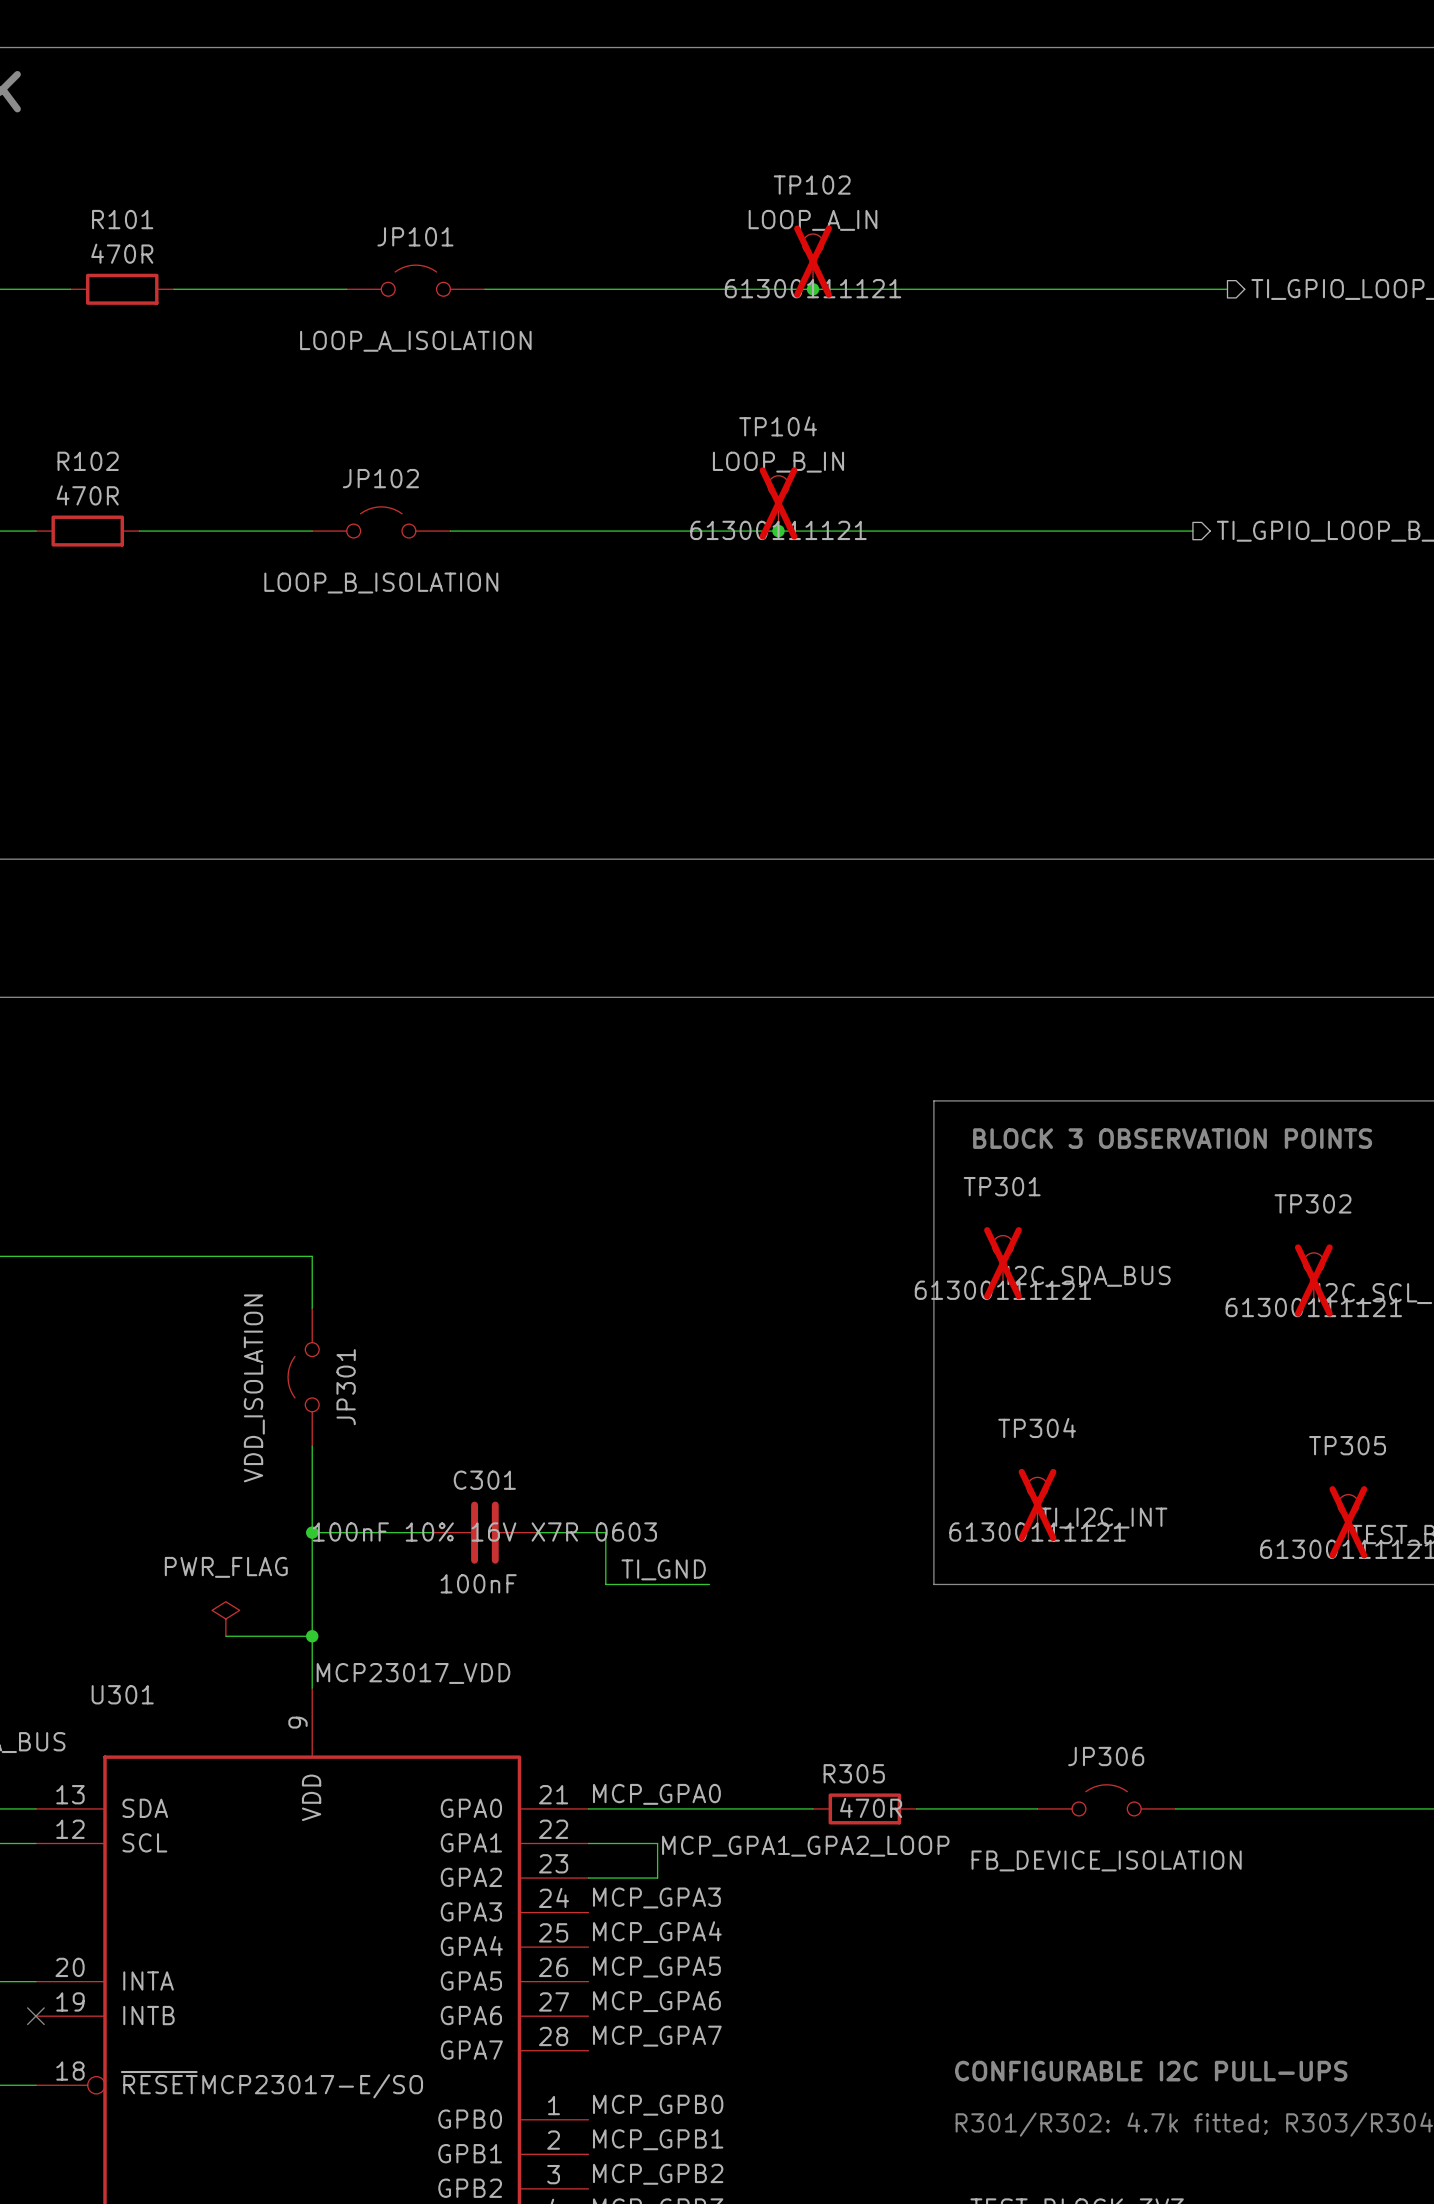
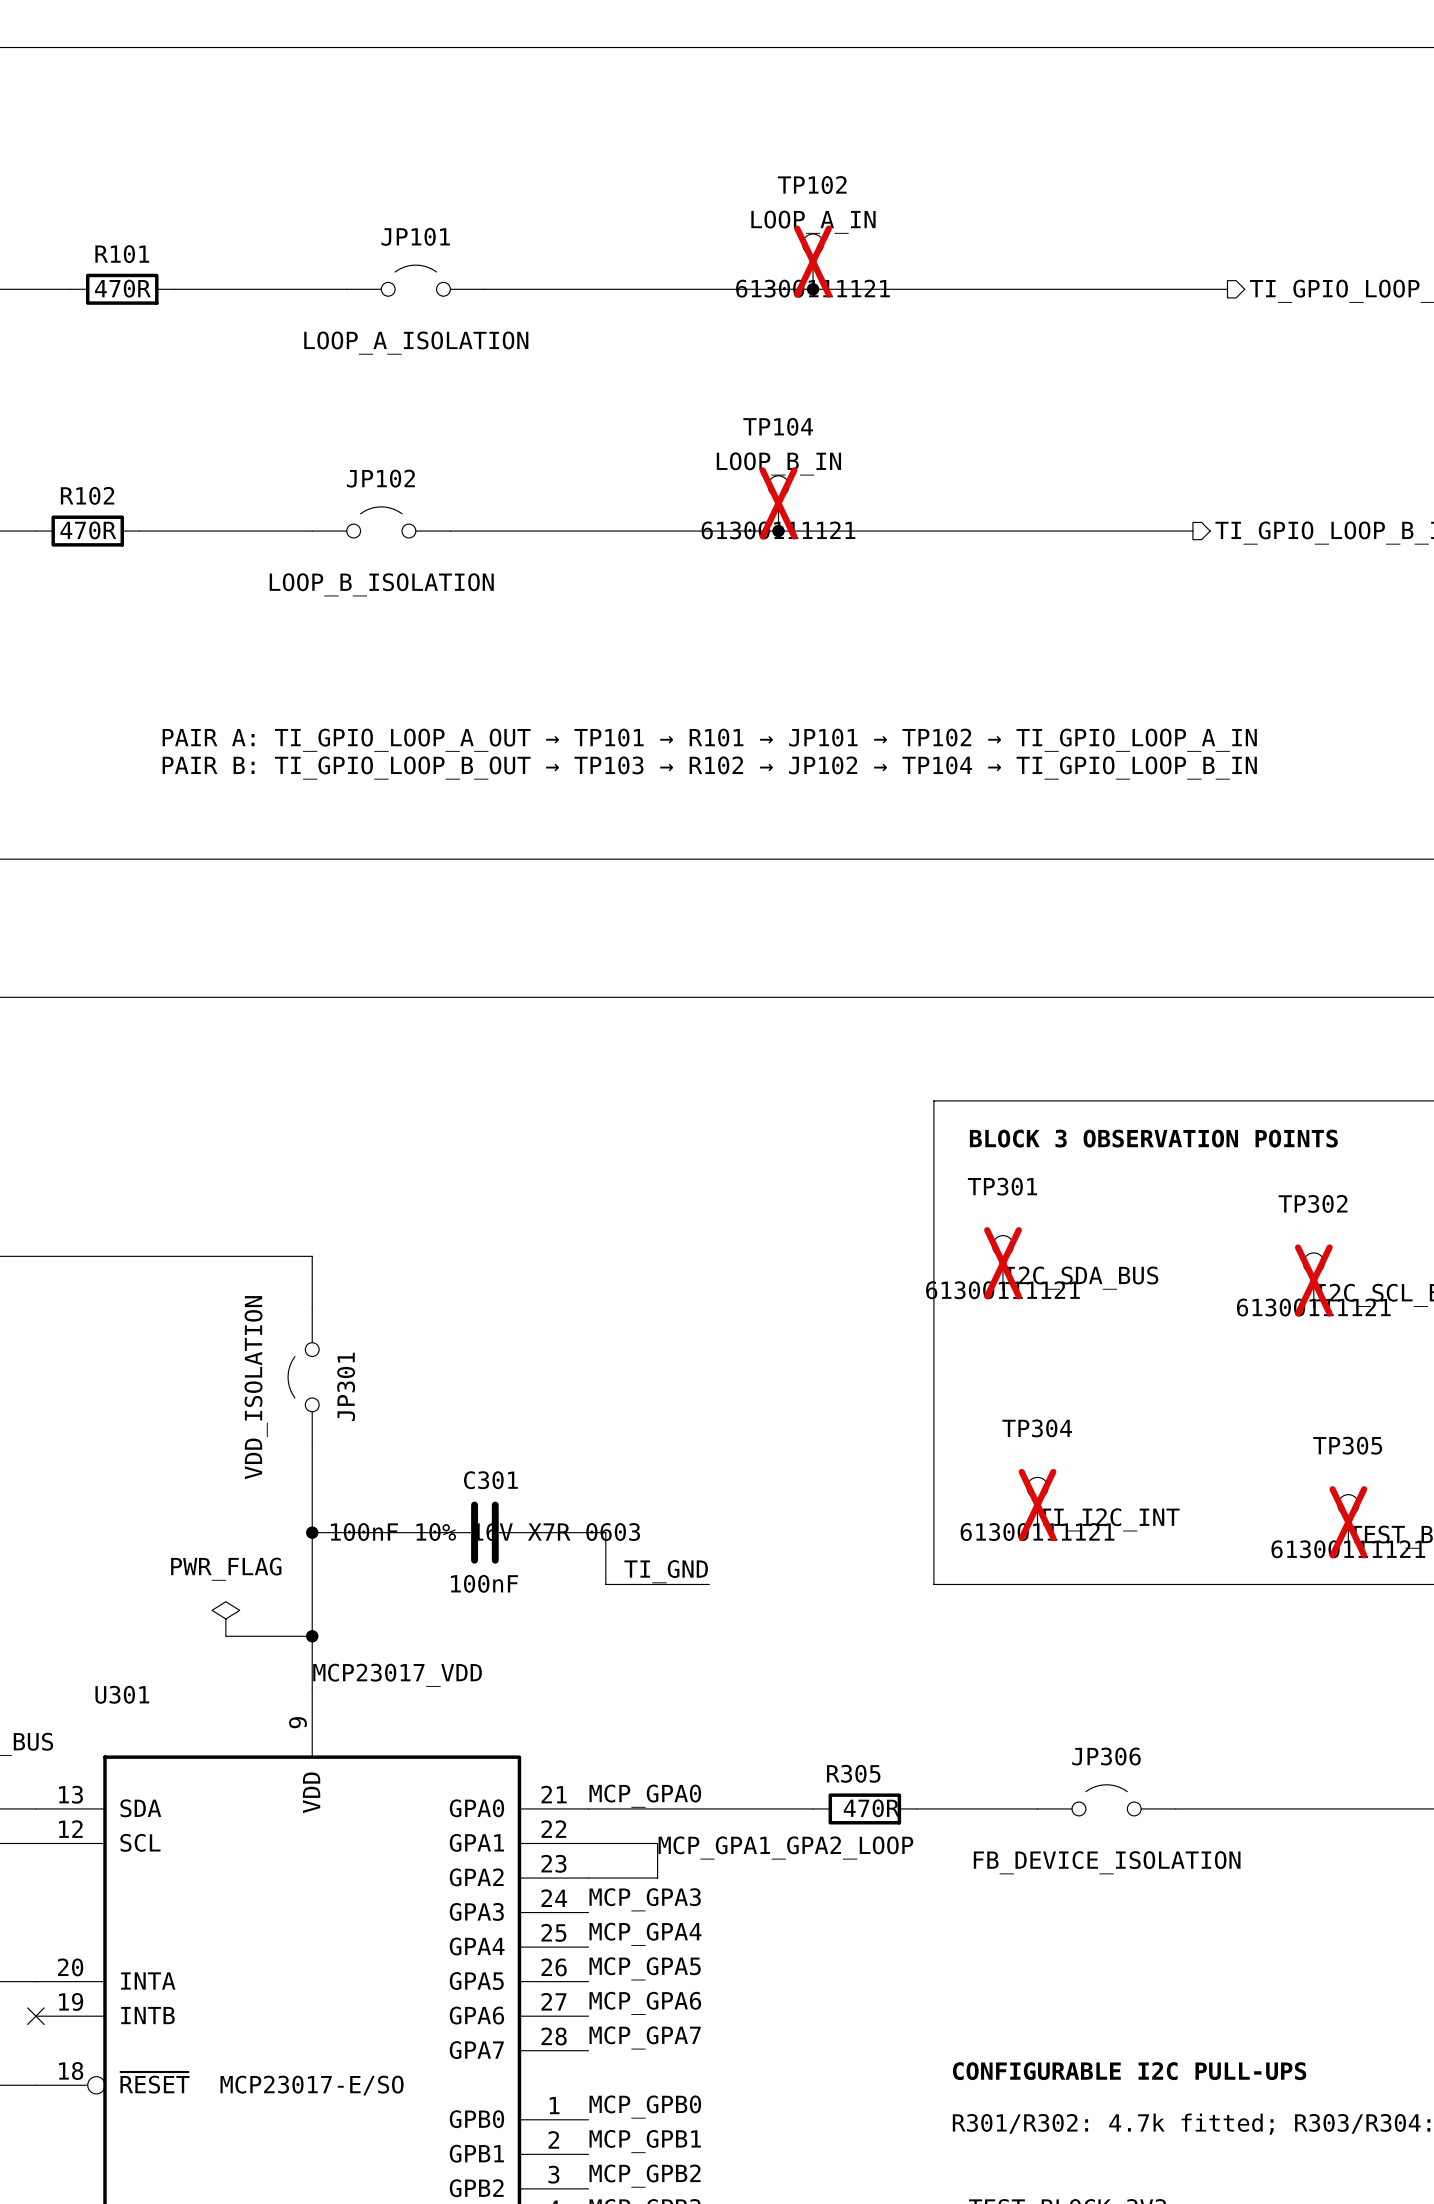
R101 name position: R101 (122, 219) -> R101 (122, 254)
R101 value position: 470R (122, 253) -> 470R (122, 288)
R102 name position: R102 (88, 461) -> R102 (87, 495)
R102 value position: 470R (87, 495) -> 470R (88, 530)
text: none -> PAIR A: TI_GPIO_LOOP_A_OUT → TP101 → R101 → JP101 → TP102 → TI_GPIO_LOOP_A_IN (709, 740)
text: none -> PAIR B: TI_GPIO_LOOP_B_OUT → TP103 → R102 → JP102 → TP104 → TI_GPIO_LOOP_B_IN (709, 768)

